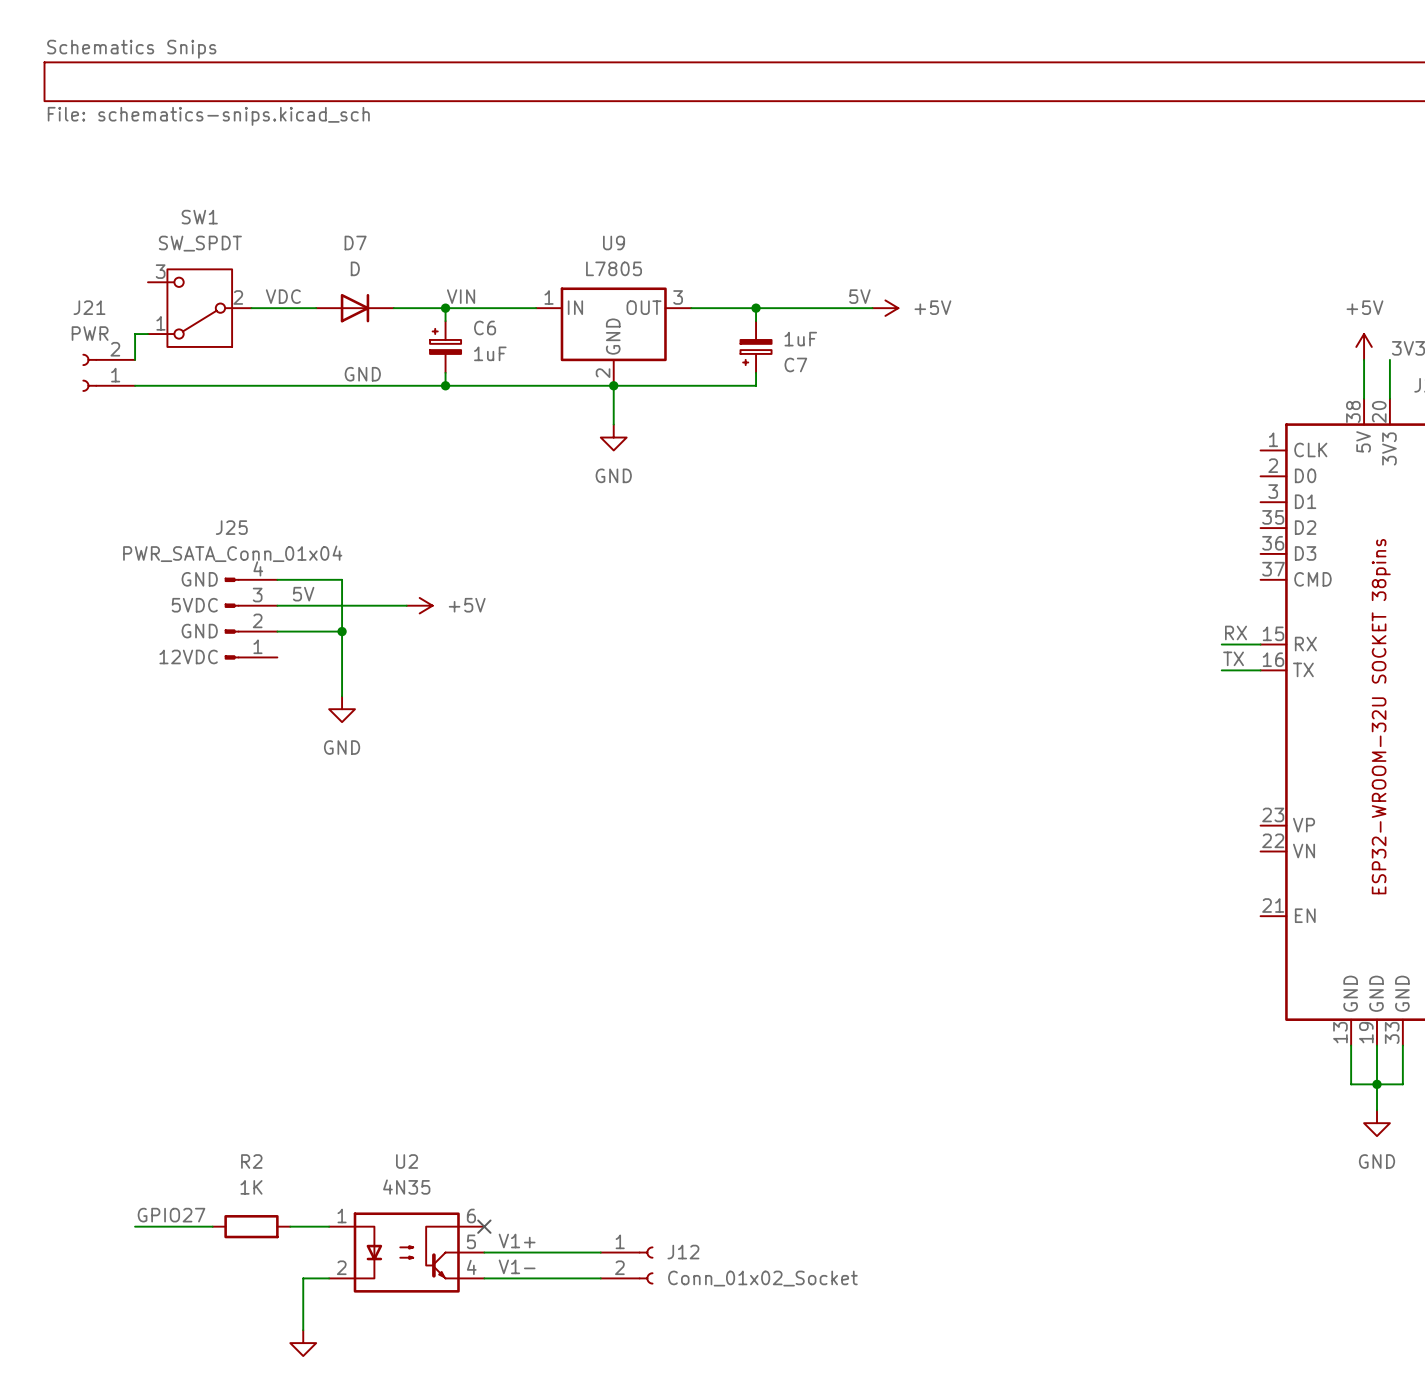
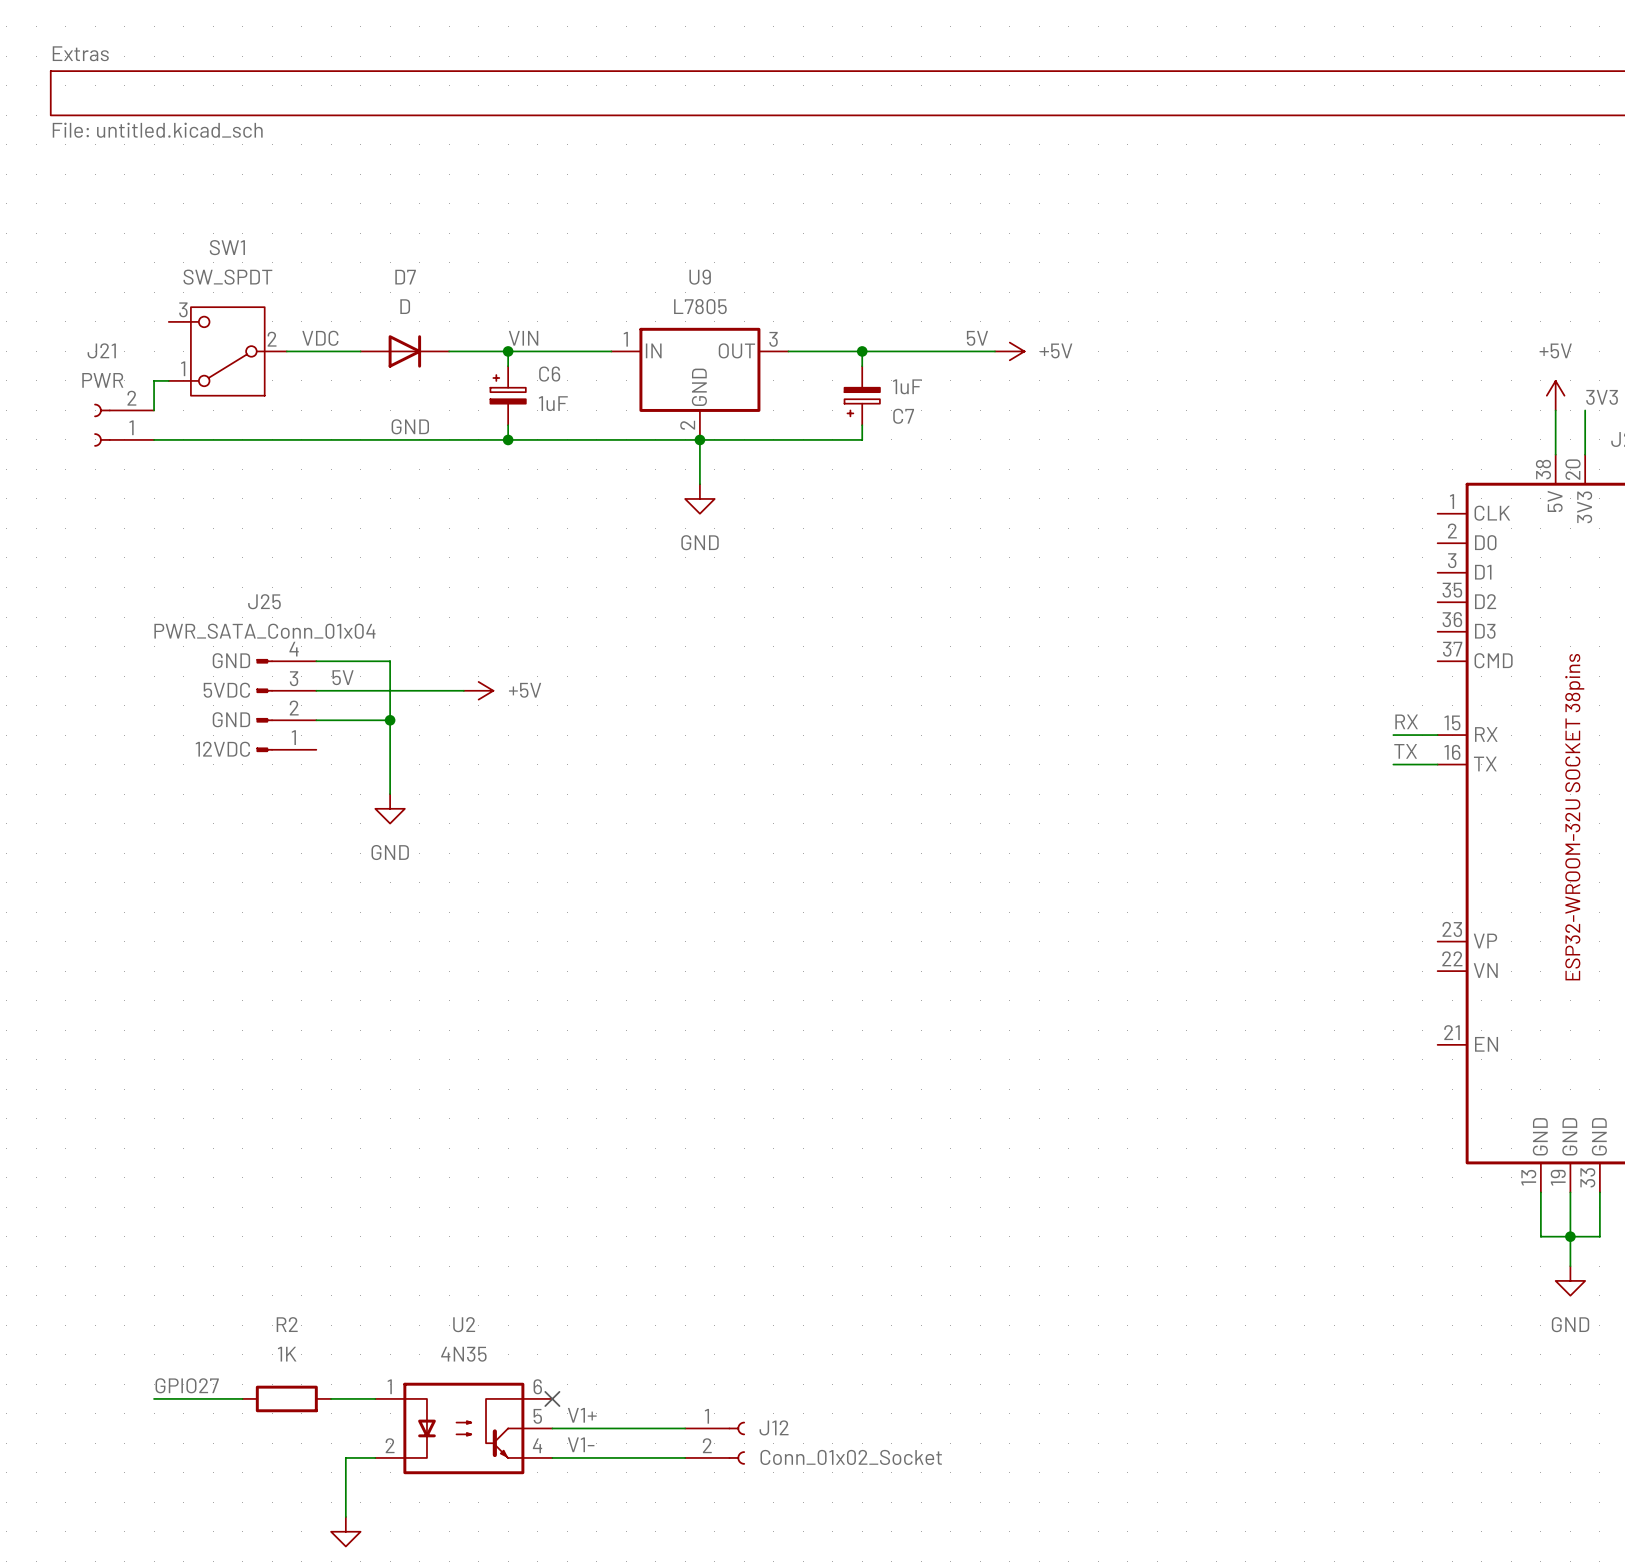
sheet Schematics Snips name: Schematics Snips (131, 49) -> Extras (80, 53)
sheet Schematics Snips value: File: schematics-snips.kicad_sch (208, 116) -> File: untitled.kicad_sch (157, 130)

